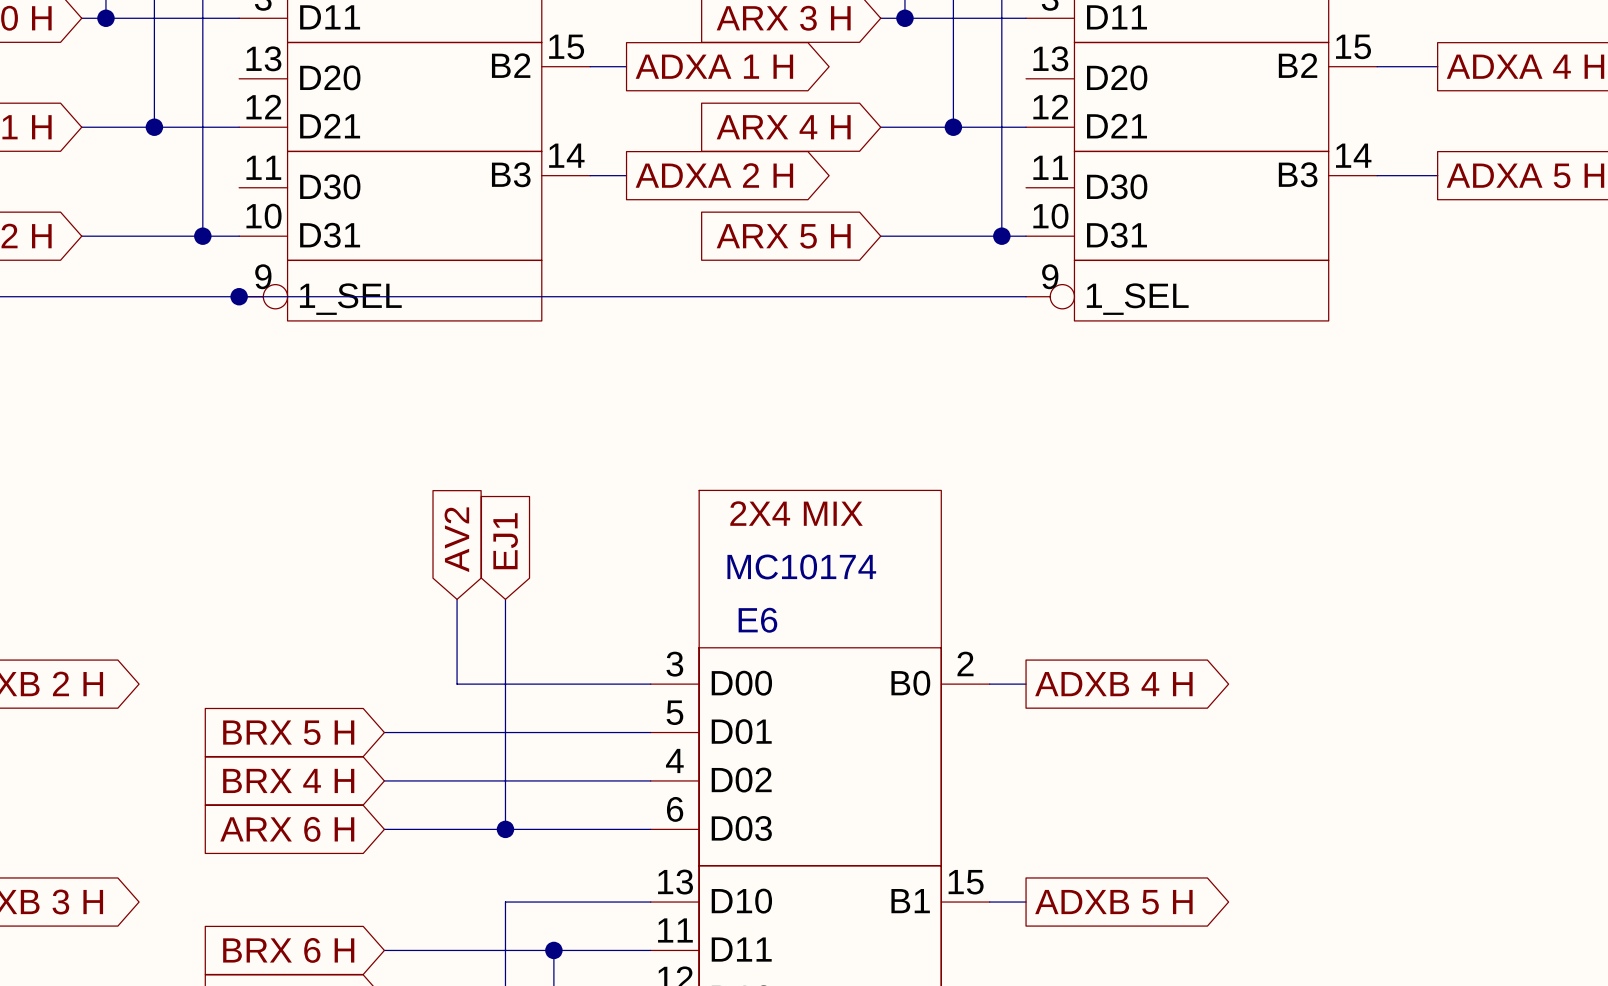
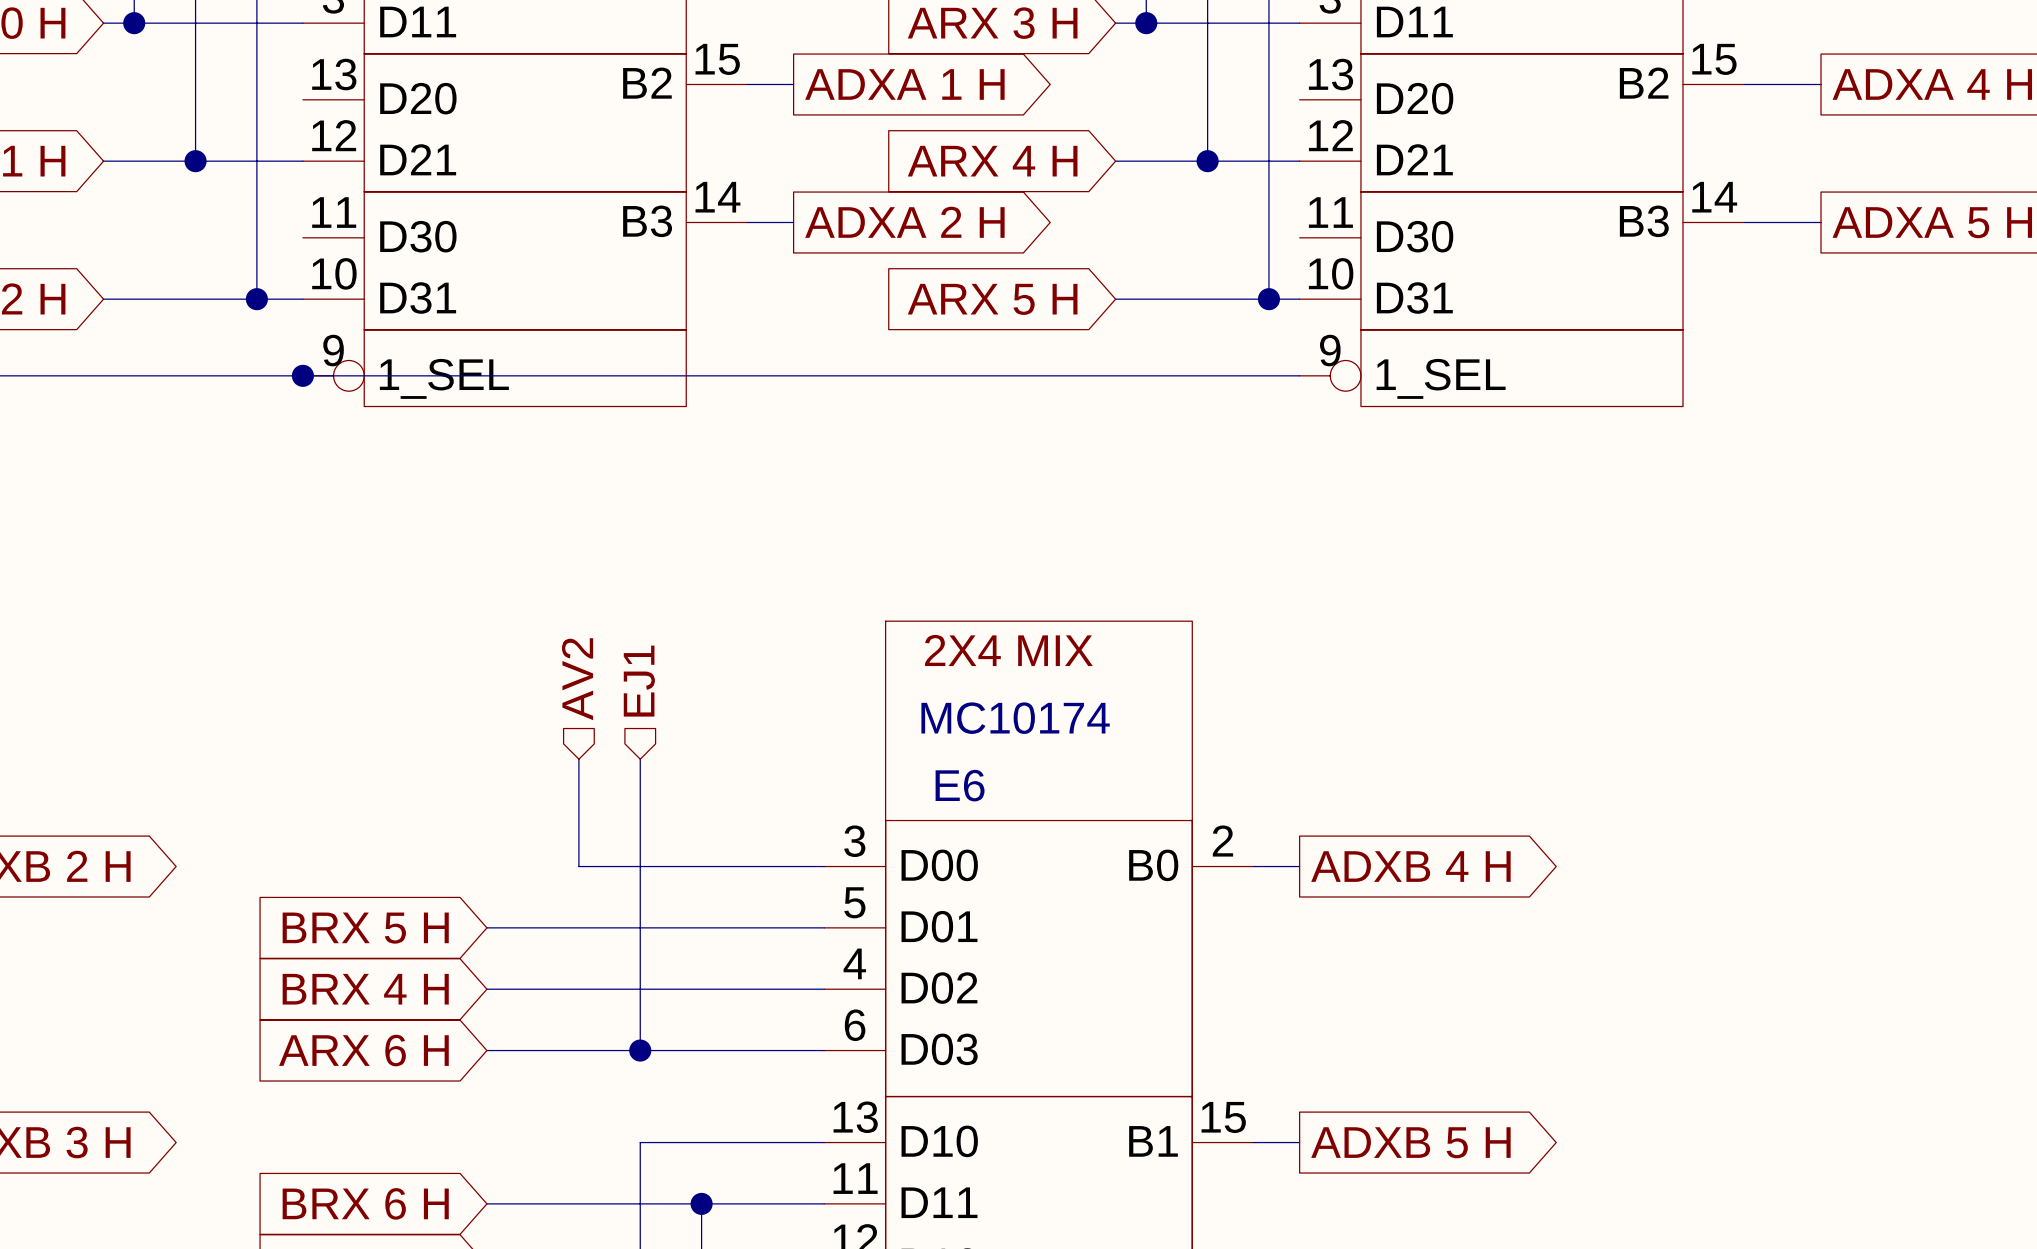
hierarchical label: none -> AV2 (577, 679)
hierarchical label: none -> EJ1 (639, 681)
global label: AV2 (456, 539) -> none
global label: EJ1 (505, 541) -> none

